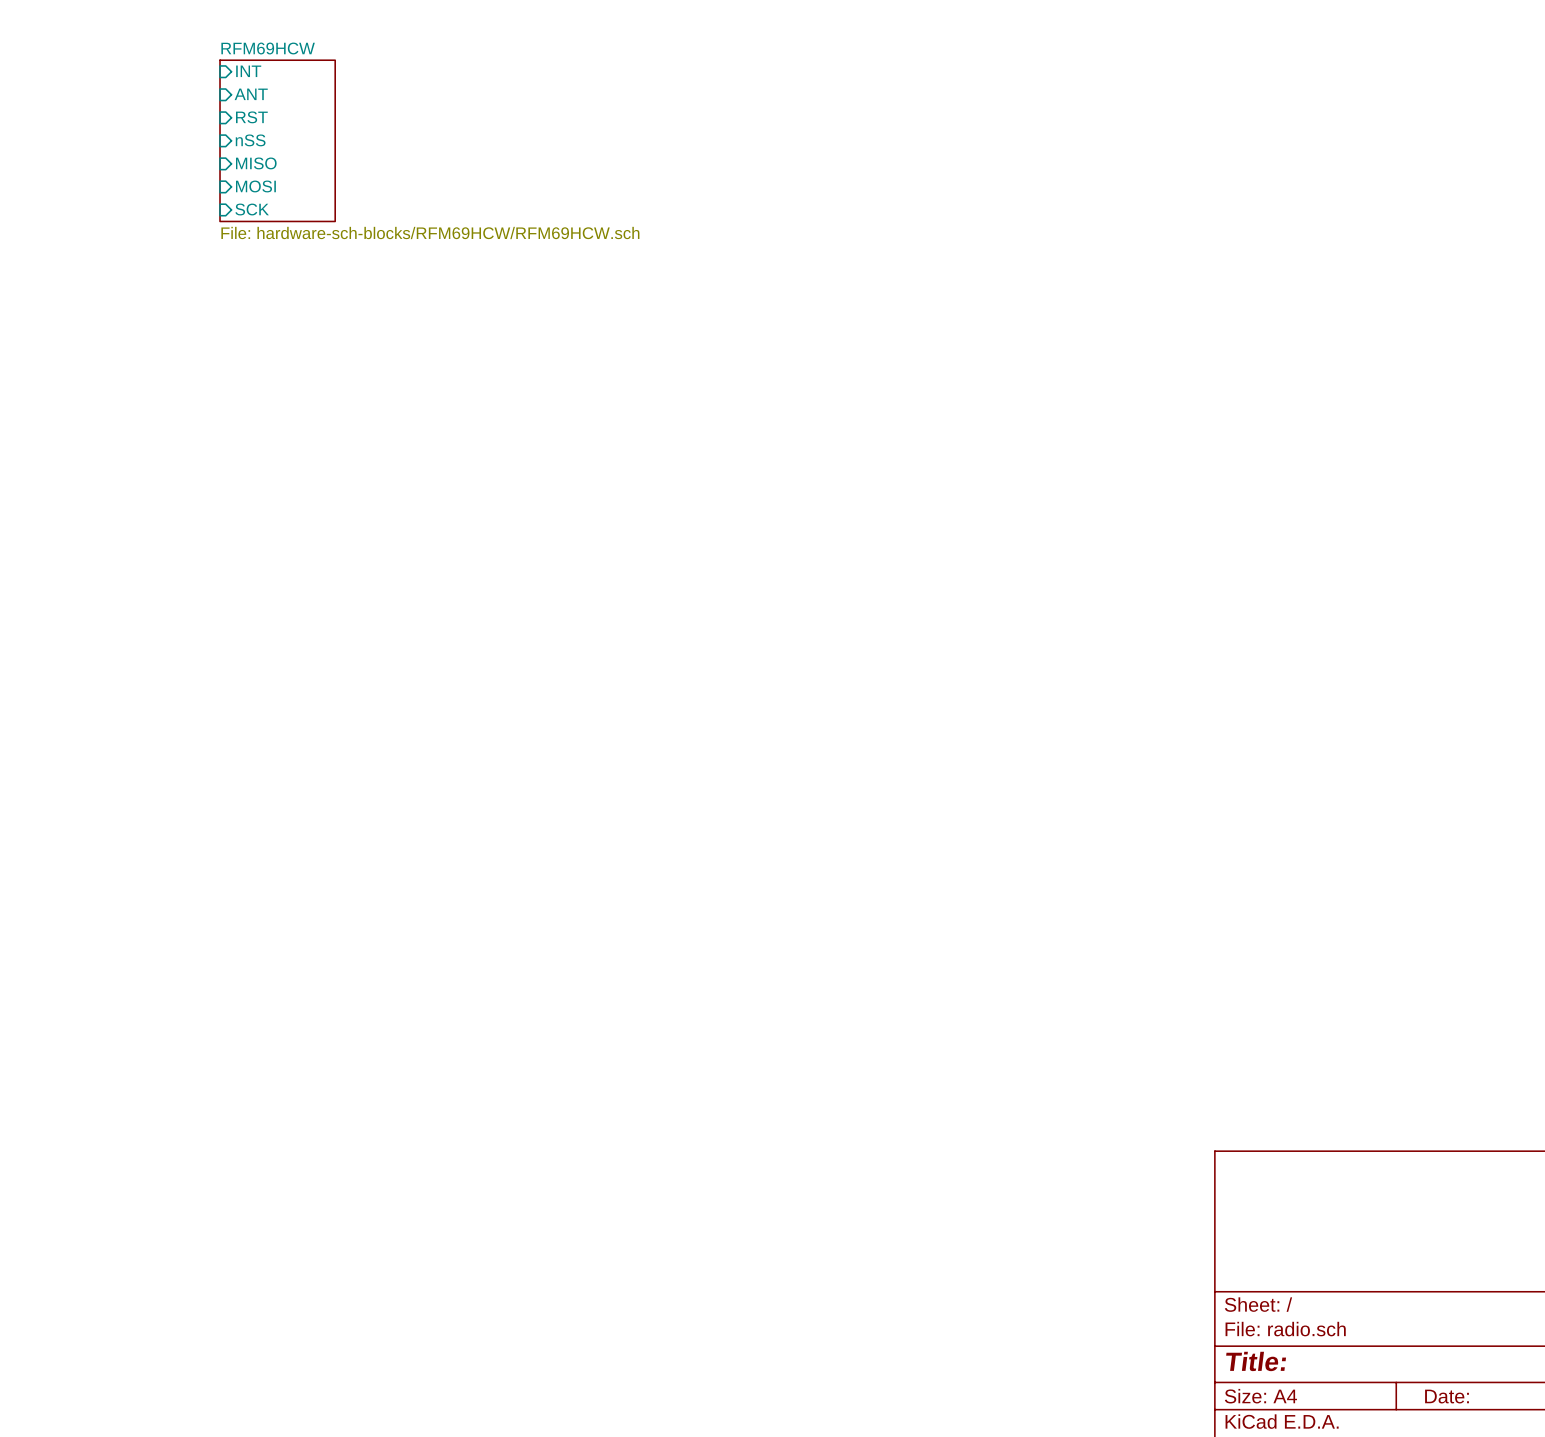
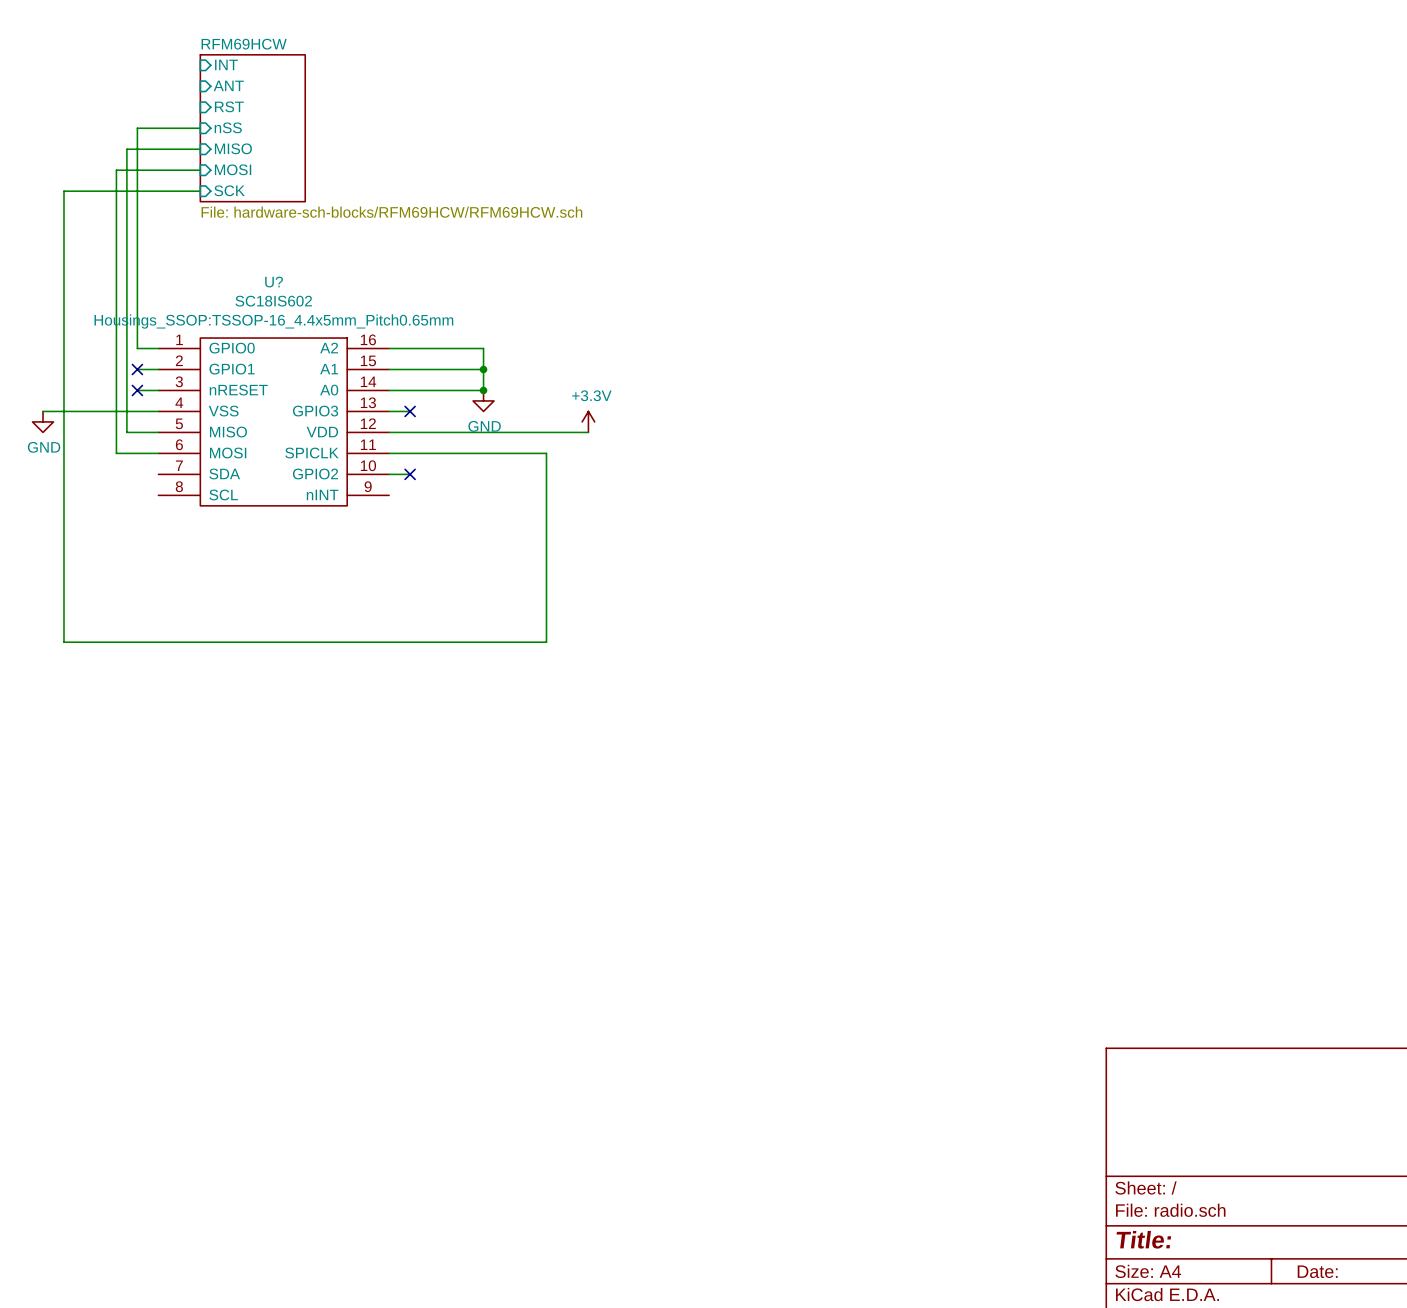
wire: none -> (200, 128) (137, 128) (137, 348) (158, 348)
wire: none -> (200, 149) (126, 149) (126, 432) (158, 432)
wire: none -> (200, 170) (116, 170) (116, 453) (158, 453)
wire: none -> (200, 191) (63, 191) (63, 642) (546, 642) (546, 453) (389, 453)
wire: none -> (389, 348) (483, 348) (483, 390) (389, 390)
wire: none -> (137, 369) (158, 369)
no-connect mark: none -> (137, 369)
wire: none -> (389, 369) (483, 369)
junction: none -> (483, 369)
wire: none -> (137, 390) (158, 390)
no-connect mark: none -> (137, 390)
junction: none -> (483, 390)
power symbol: none -> GND (483, 400)
wire: none -> (43, 411) (158, 411)
wire: none -> (389, 411) (410, 411)
no-connect mark: none -> (410, 411)
power symbol: none -> GND (43, 421)
U?: none -> SC18IS602 (273, 421)
power symbol: none -> +3.3V (588, 421)
wire: none -> (389, 432) (588, 432)
wire: none -> (389, 474) (410, 474)
no-connect mark: none -> (410, 474)

